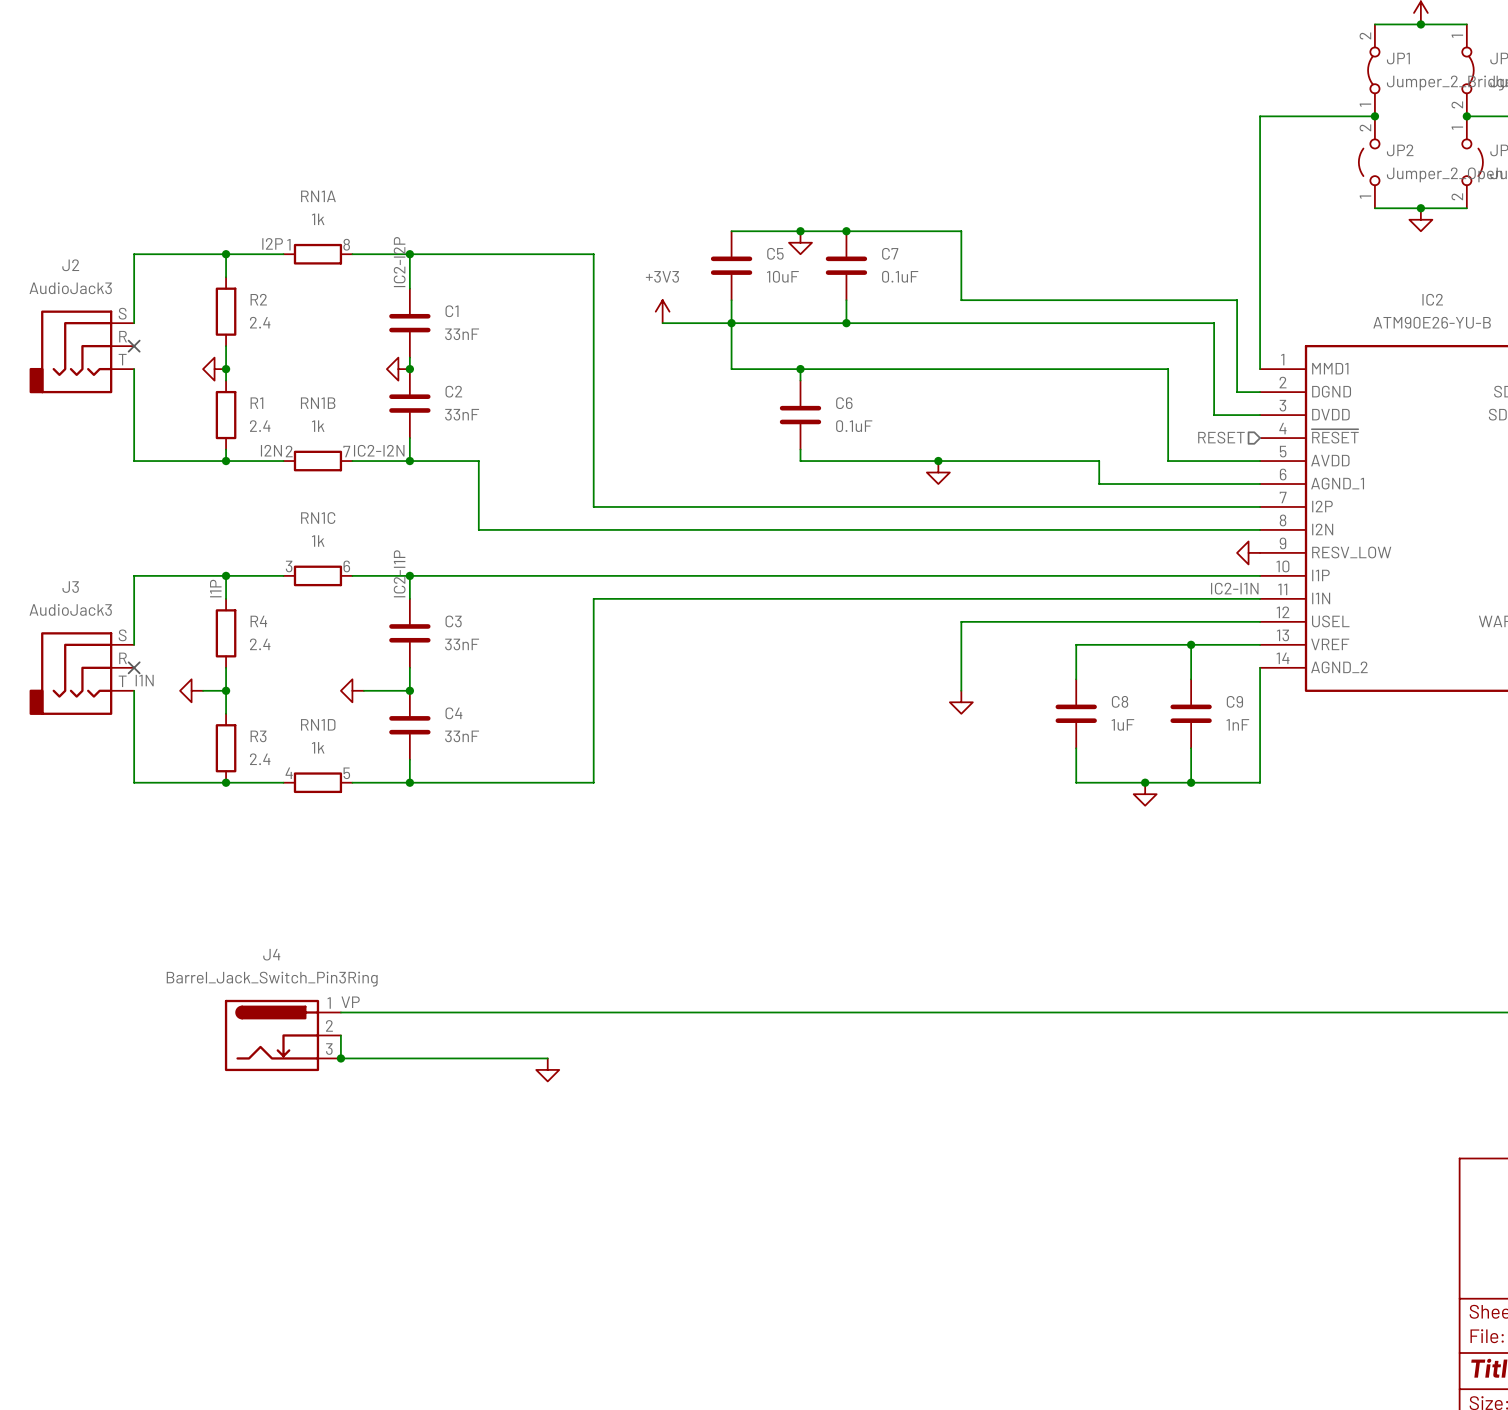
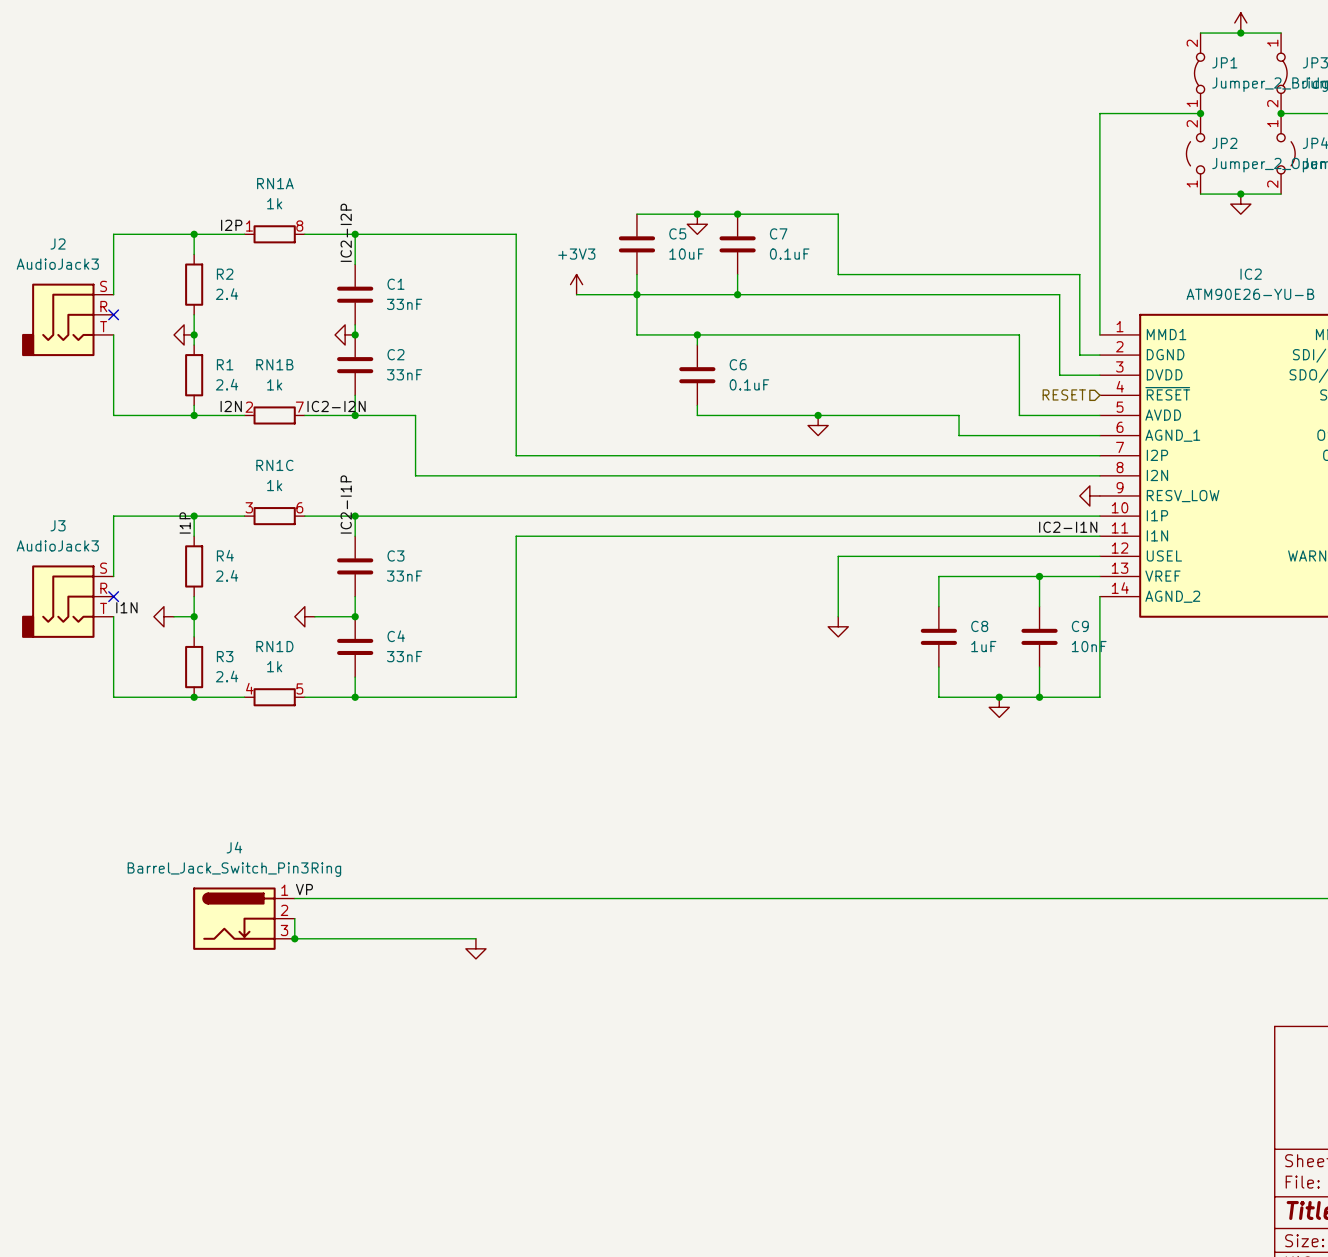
C9 value: 1nF (1237, 724) -> 10nF (1089, 646)

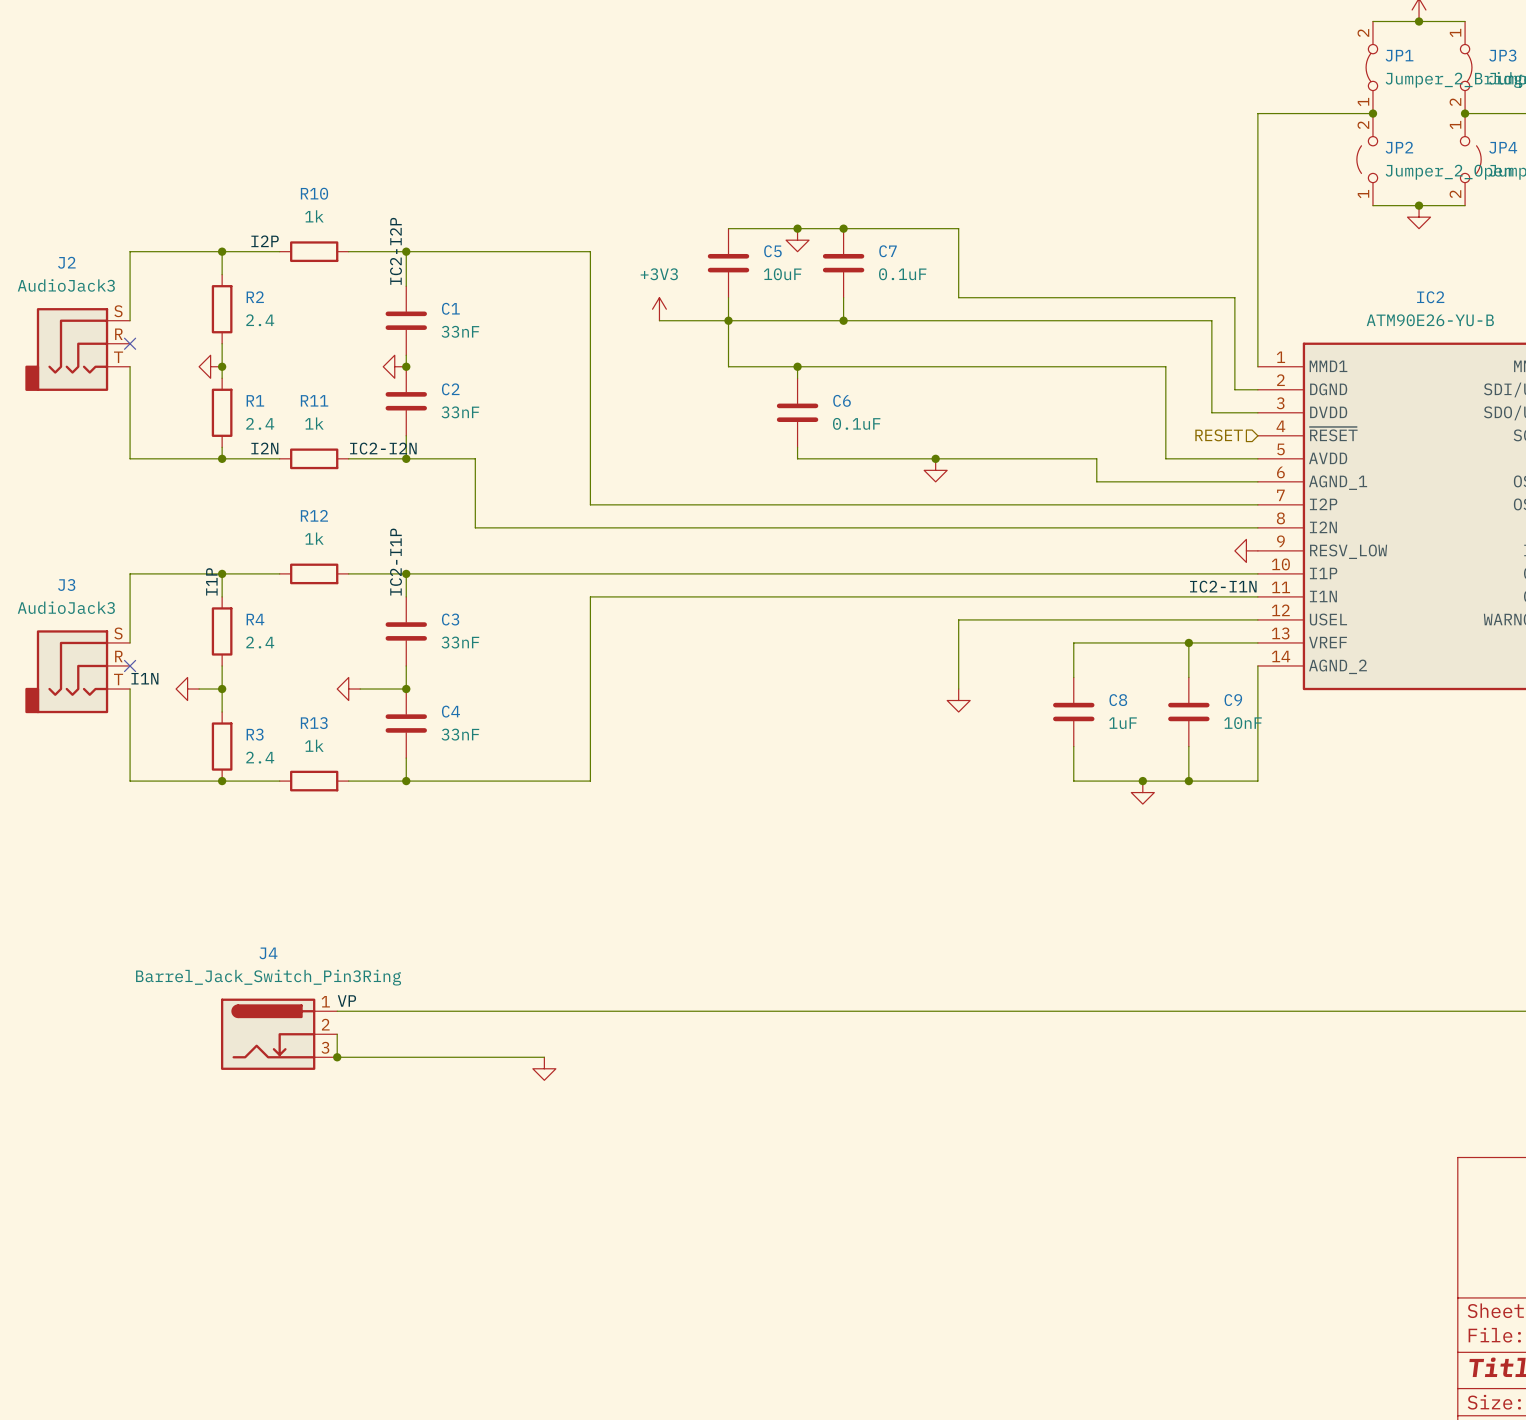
RN1A name: RN1A (275, 183) -> R10 (314, 193)
RN1A pin number: 1 (249, 226) -> none
RN1A pin number: 8 (299, 226) -> none
RN1B name: RN1B (274, 364) -> R11 (314, 400)
RN1B pin number: 2 (249, 407) -> none
RN1B pin number: 7 (299, 407) -> none
RN1C name: RN1C (274, 465) -> R12 (314, 515)
RN1C pin number: 3 (249, 507) -> none
RN1C pin number: 6 (299, 507) -> none
RN1D name: RN1D (274, 646) -> R13 (314, 723)
RN1D pin number: 4 (249, 688) -> none
RN1D pin number: 5 (299, 688) -> none

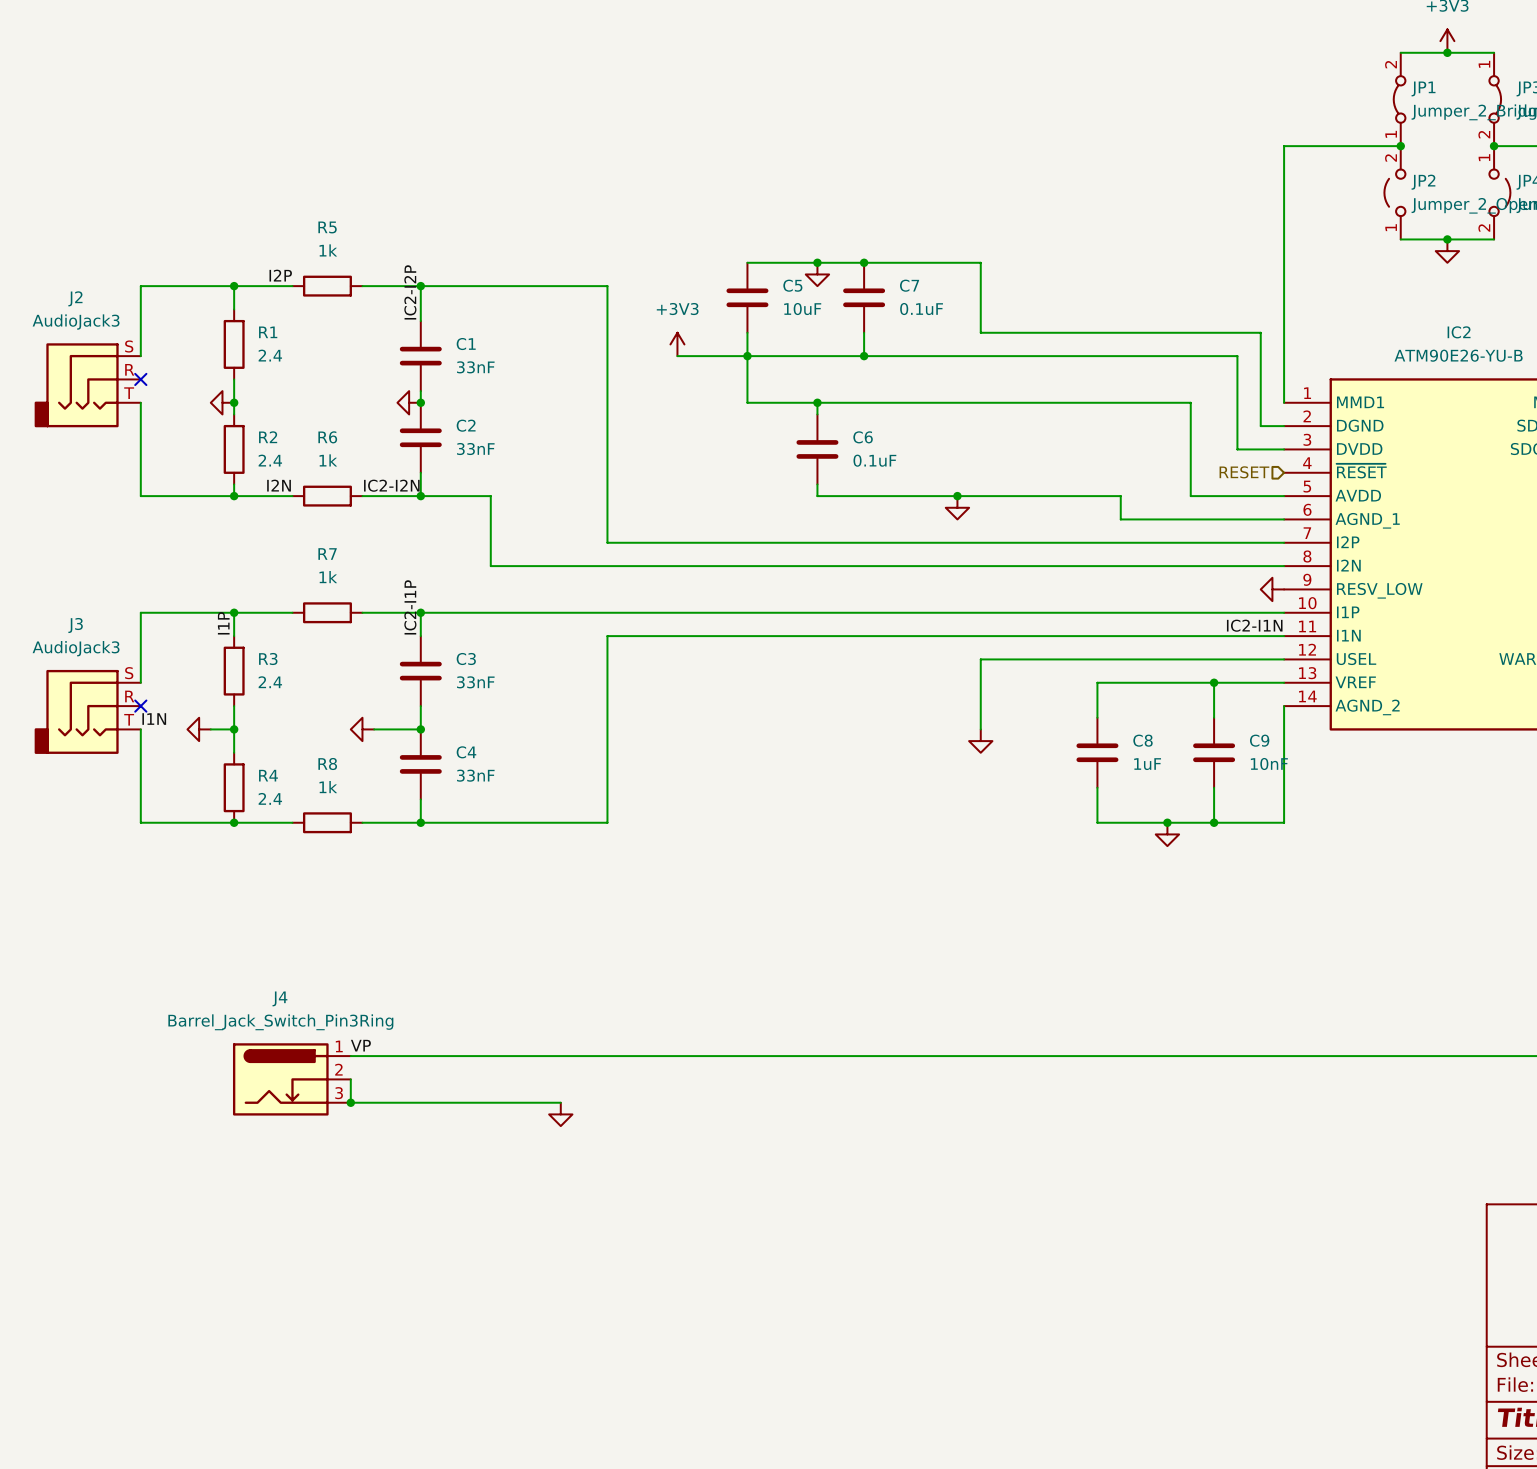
R10 name: R10 (314, 193) -> R5 (327, 227)
R2 name: R2 (255, 297) -> R1 (268, 332)
R1 name: R1 (255, 400) -> R2 (268, 437)
R11 name: R11 (314, 400) -> R6 (327, 437)
R12 name: R12 (314, 515) -> R7 (327, 554)
R4 name: R4 (255, 619) -> R3 (268, 659)
R13 name: R13 (314, 723) -> R8 (327, 764)
R3 name: R3 (255, 734) -> R4 (268, 775)

